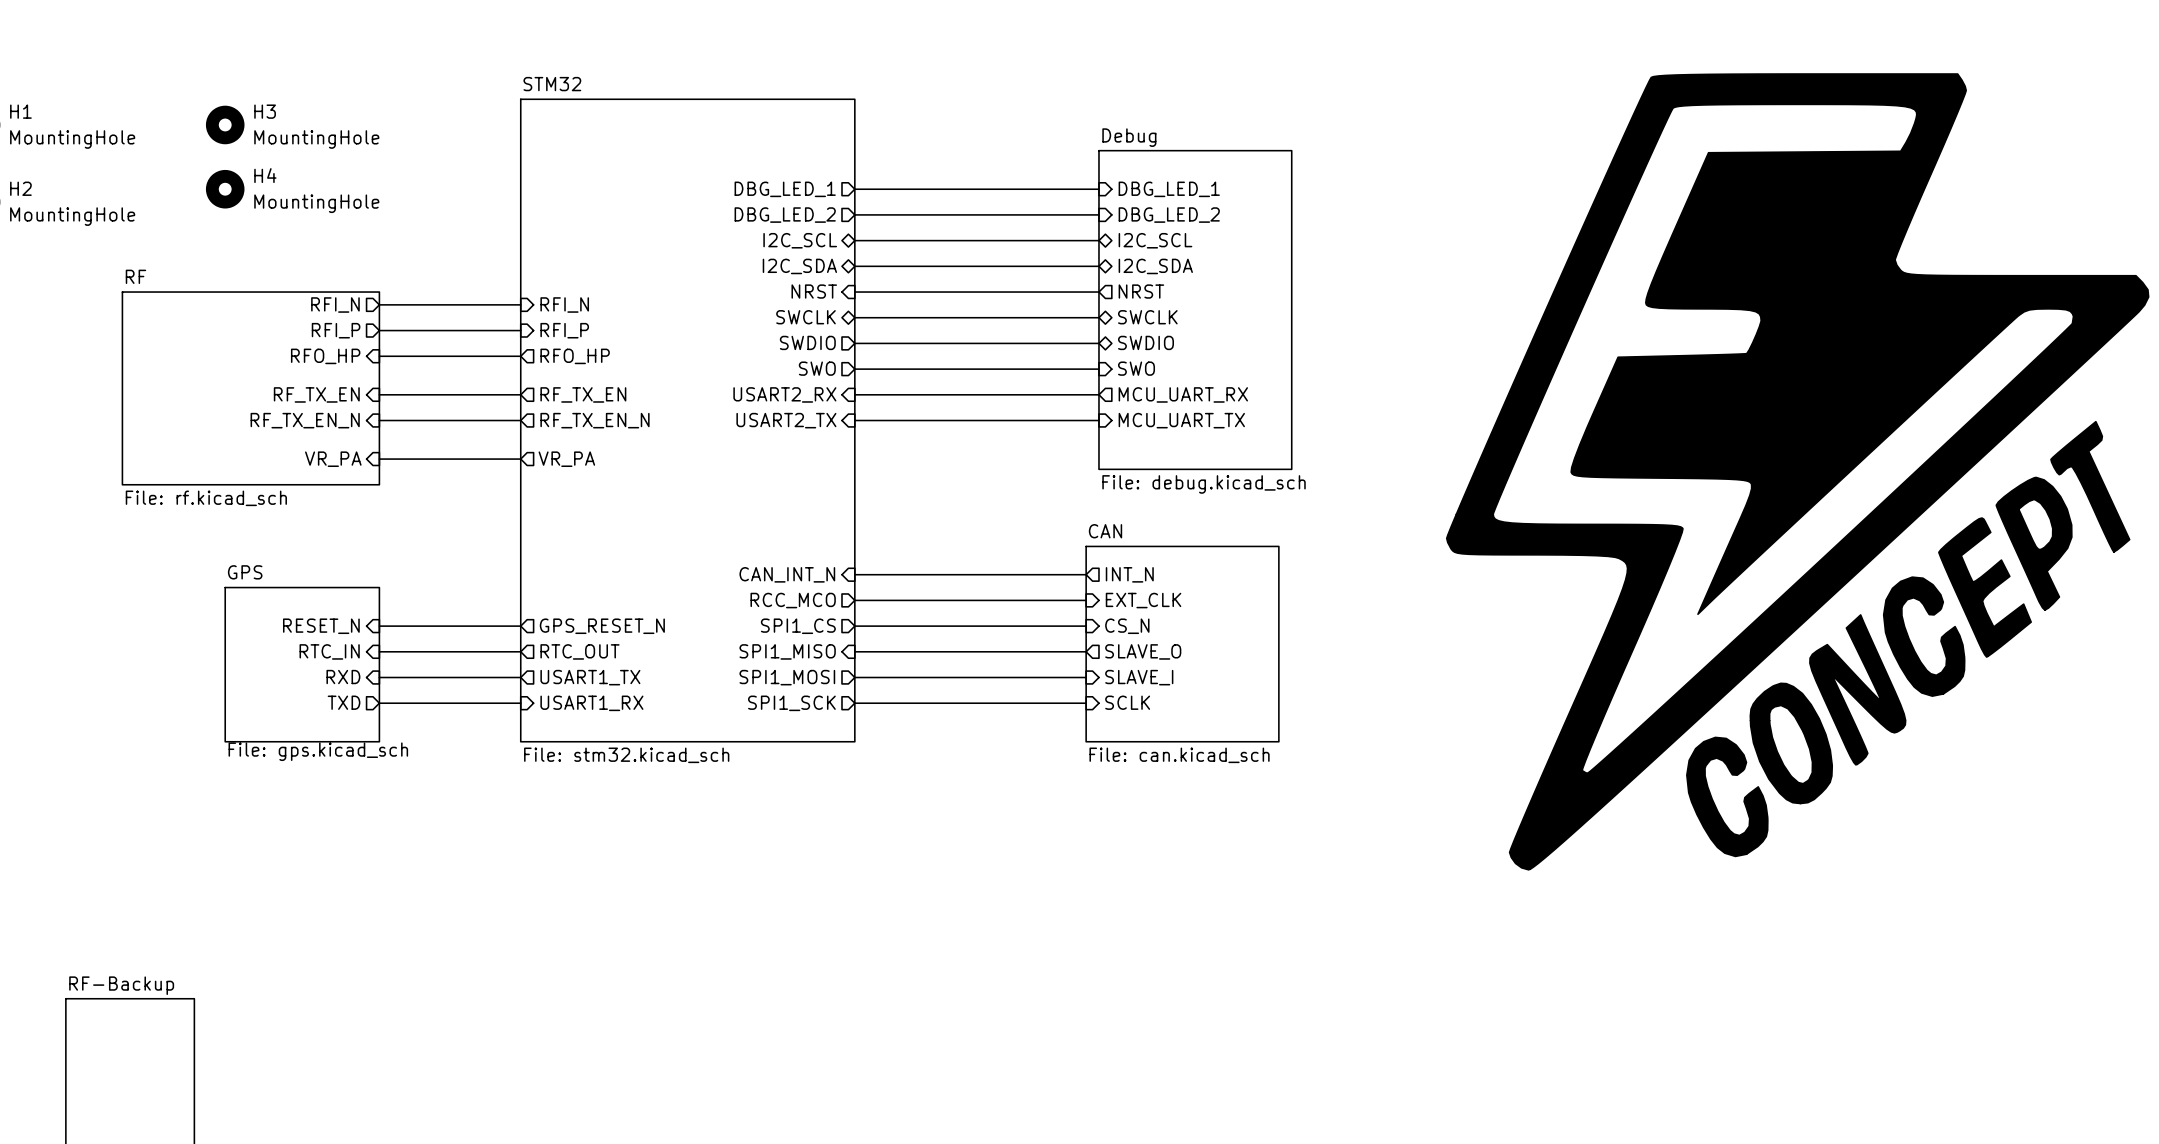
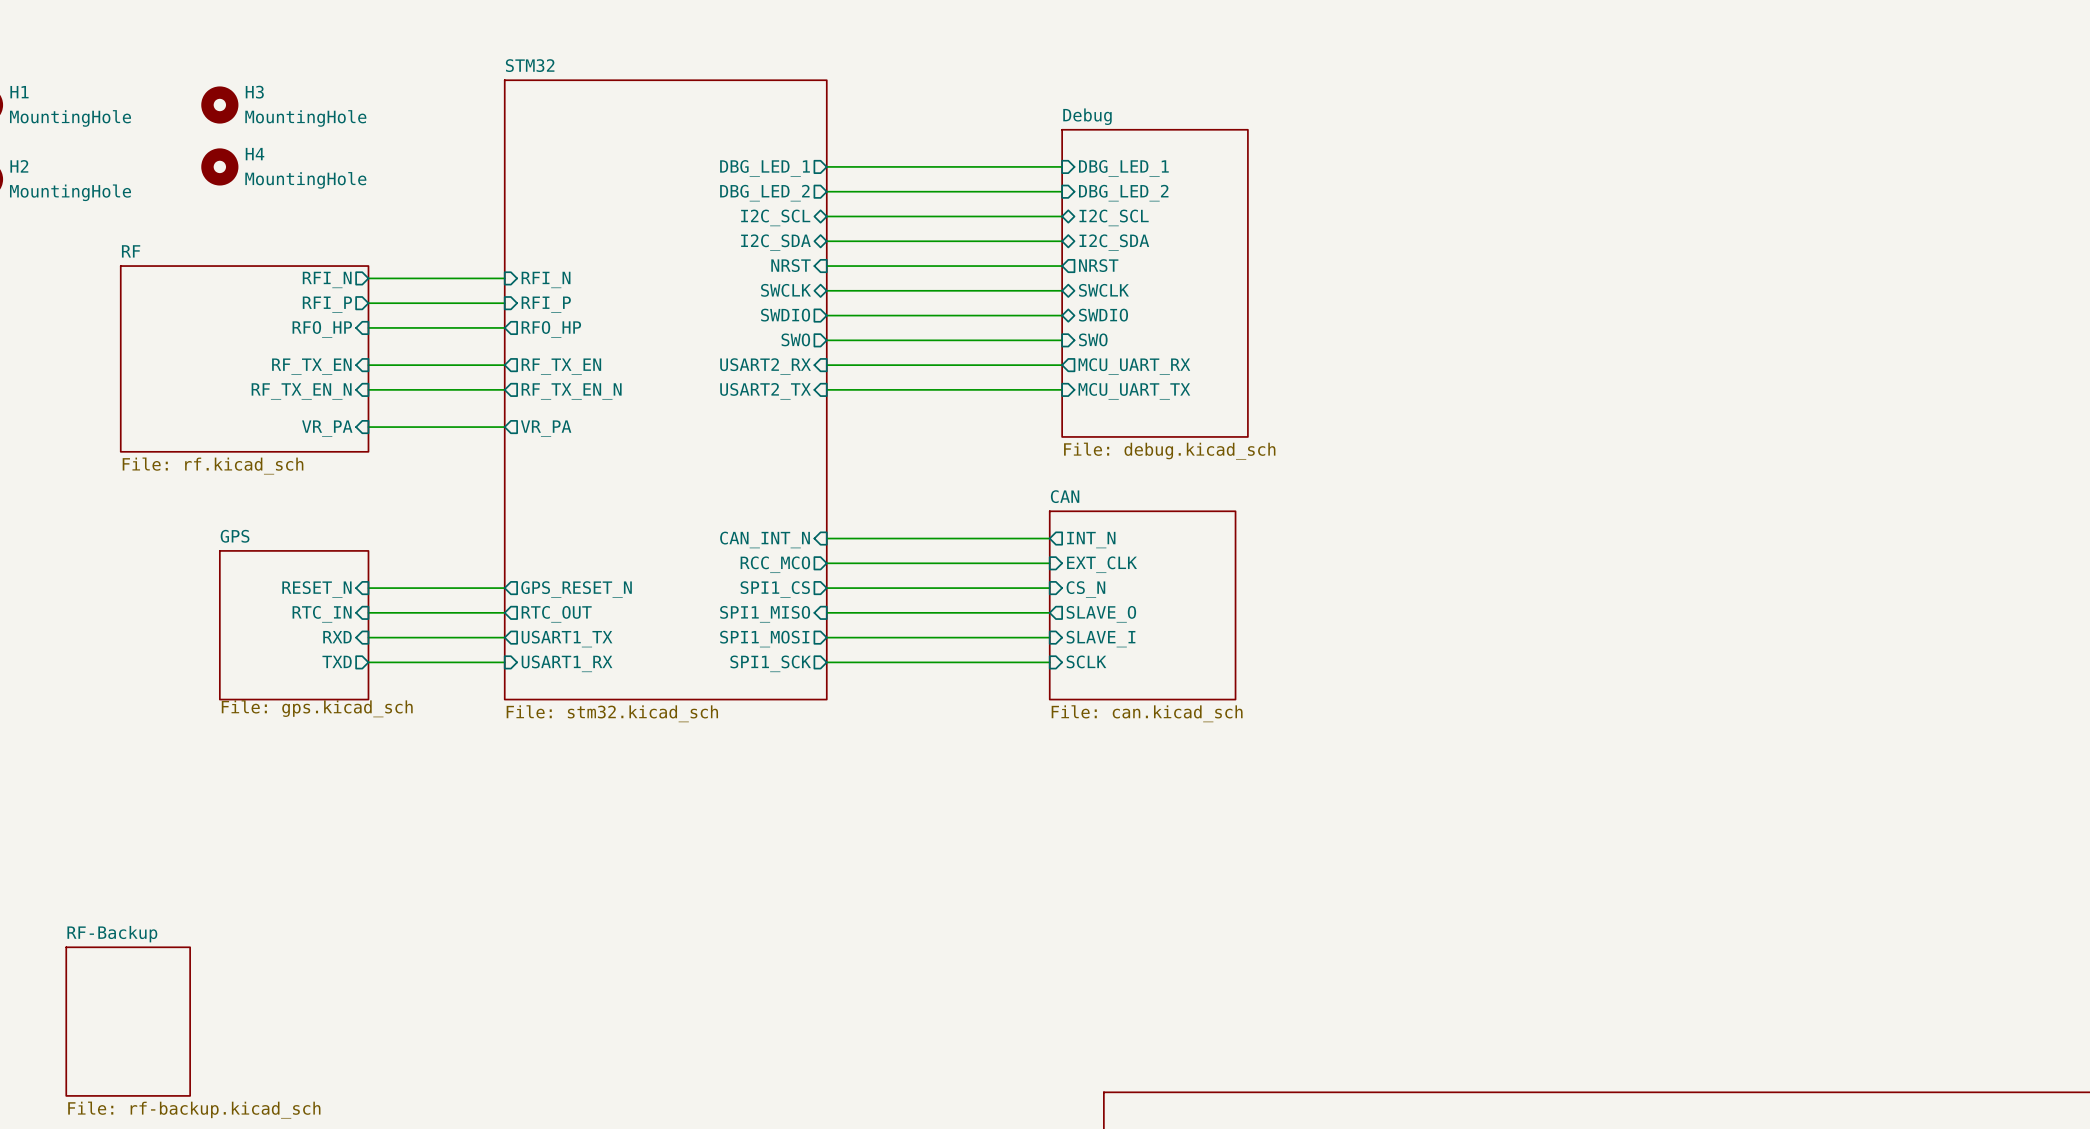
power symbol: (1797, 471) -> none

